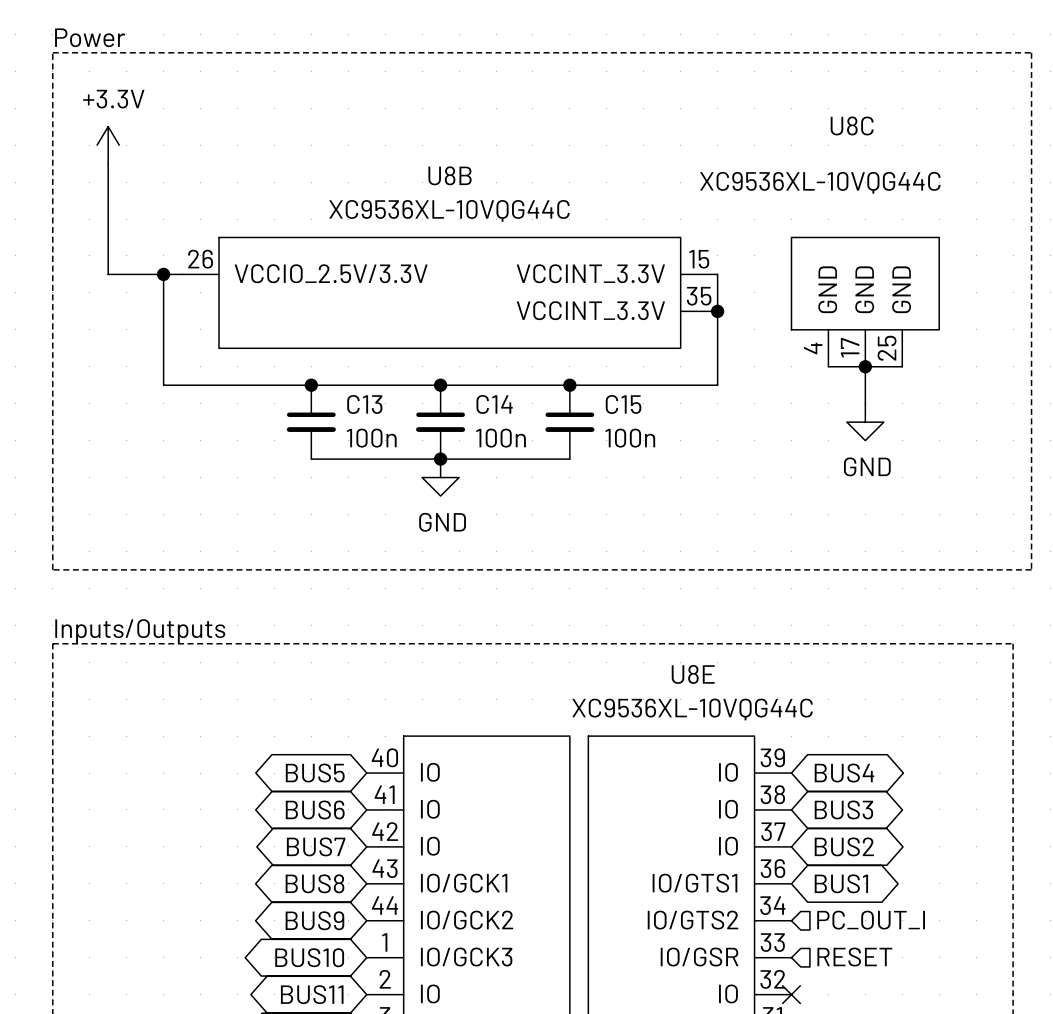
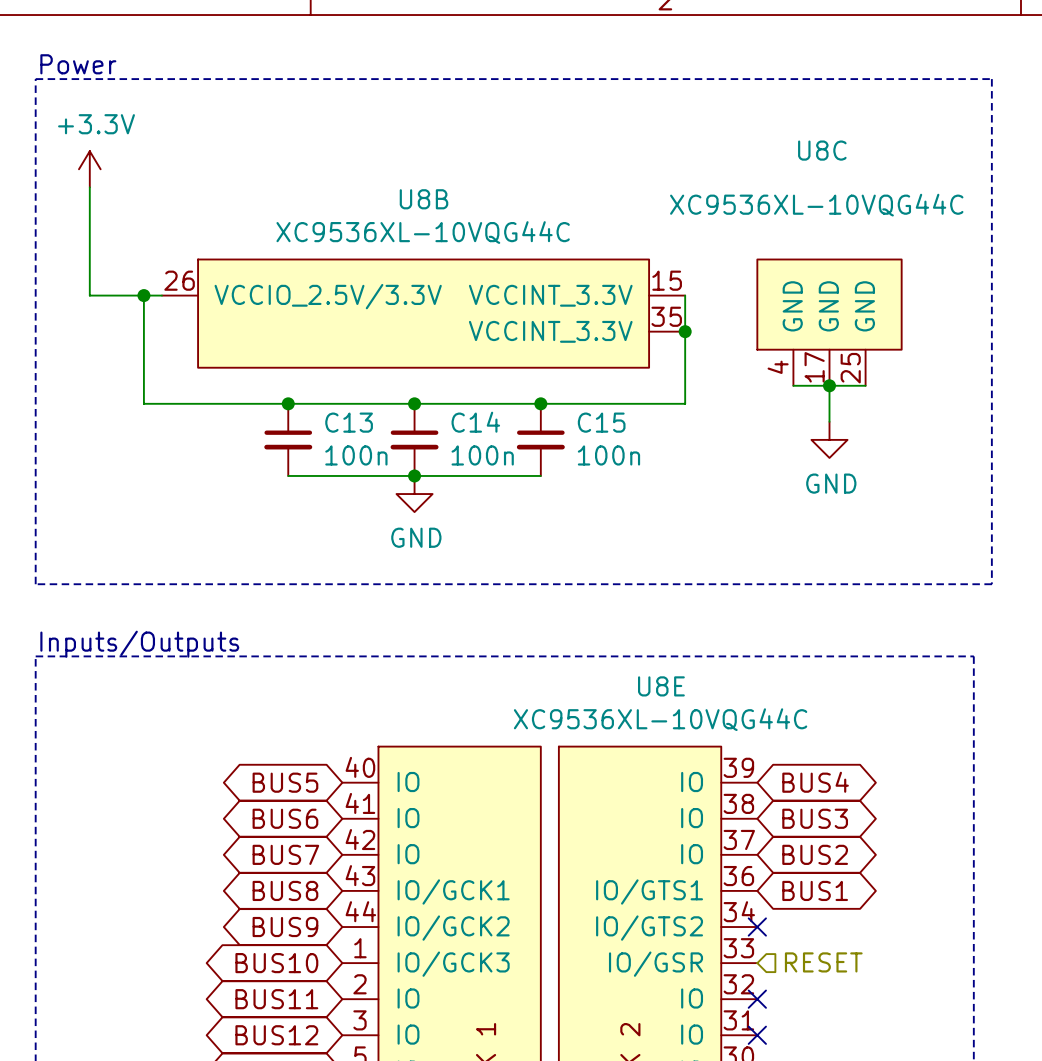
no-connect mark: none -> (757, 927)
hierarchical label: PC_OUT_I (871, 920) -> none

